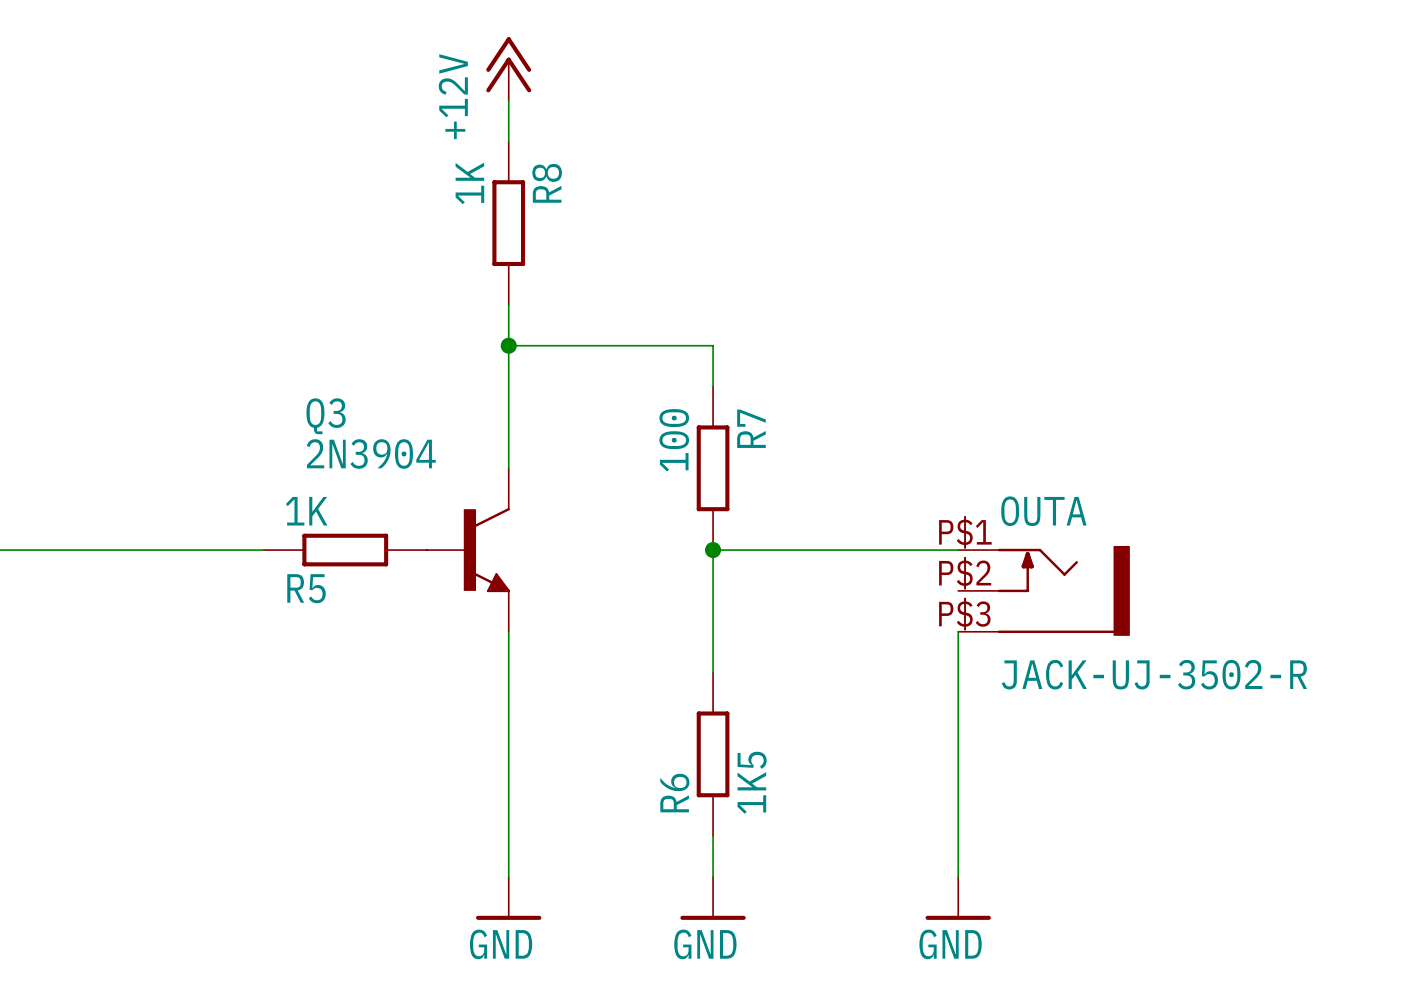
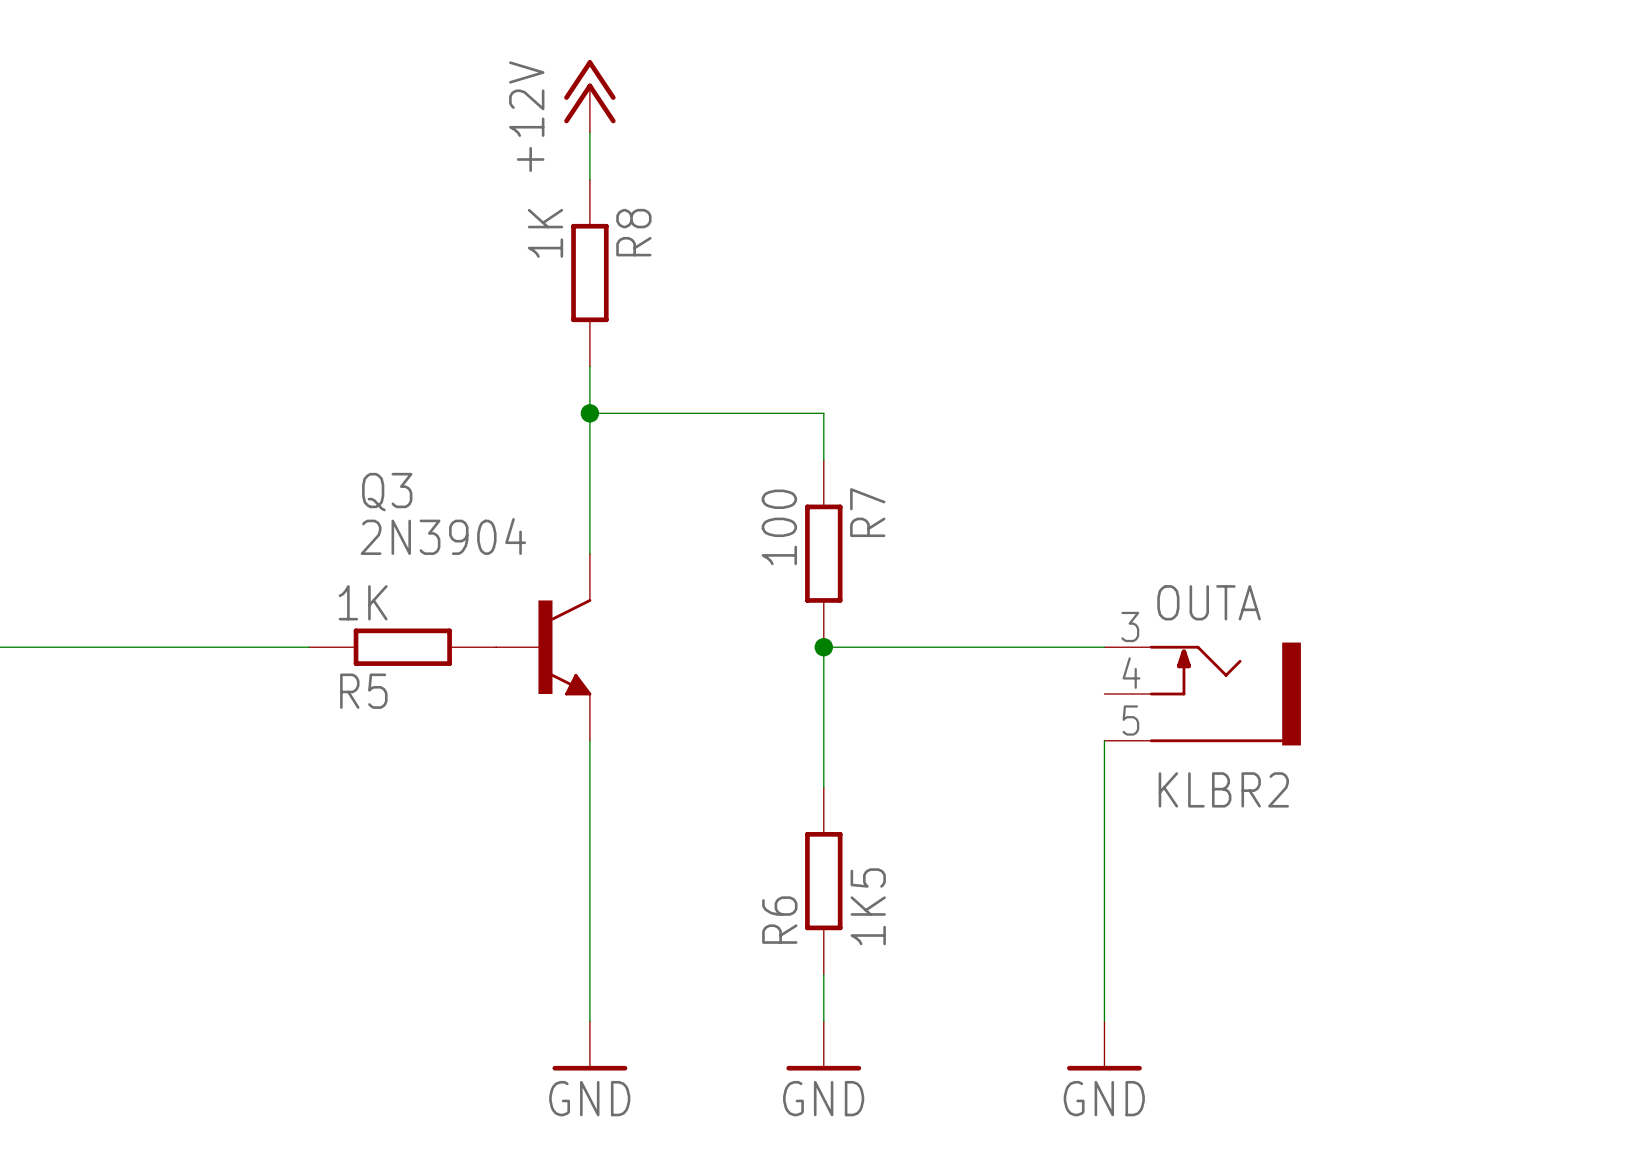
OUTA pin number: P$1 (965, 532) -> 3 (1130, 626)
OUTA pin number: P$2 (965, 573) -> 4 (1131, 673)
OUTA pin number: P$3 (964, 614) -> 5 (1130, 720)
OUTA value: JACK-UJ-3502-R (1154, 674) -> KLBR2 (1223, 789)

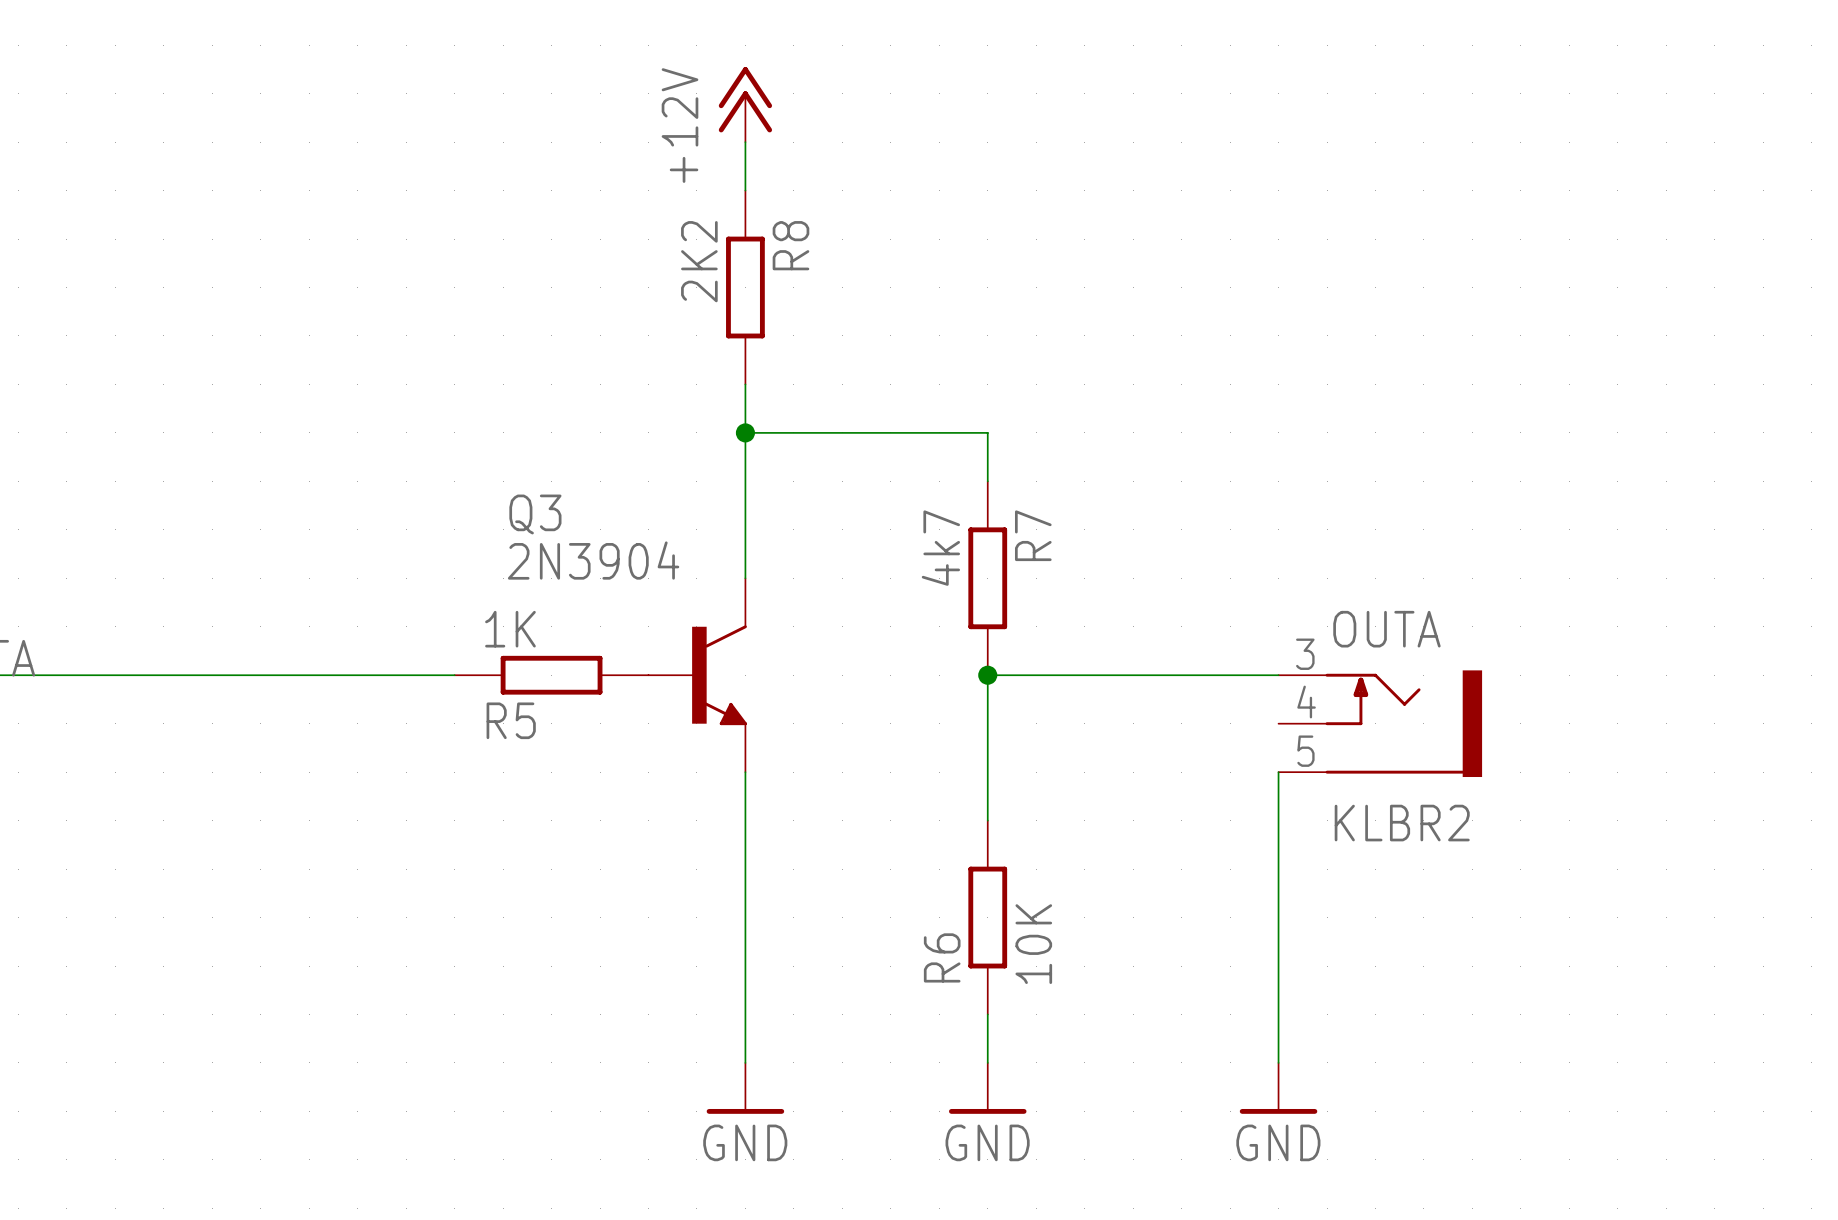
R8 value: 1K (545, 233) -> 2K2 (699, 261)
R7 value: 100 (779, 527) -> 4k7 (940, 548)
R6 value: 1K5 (868, 906) -> 10K (1033, 944)

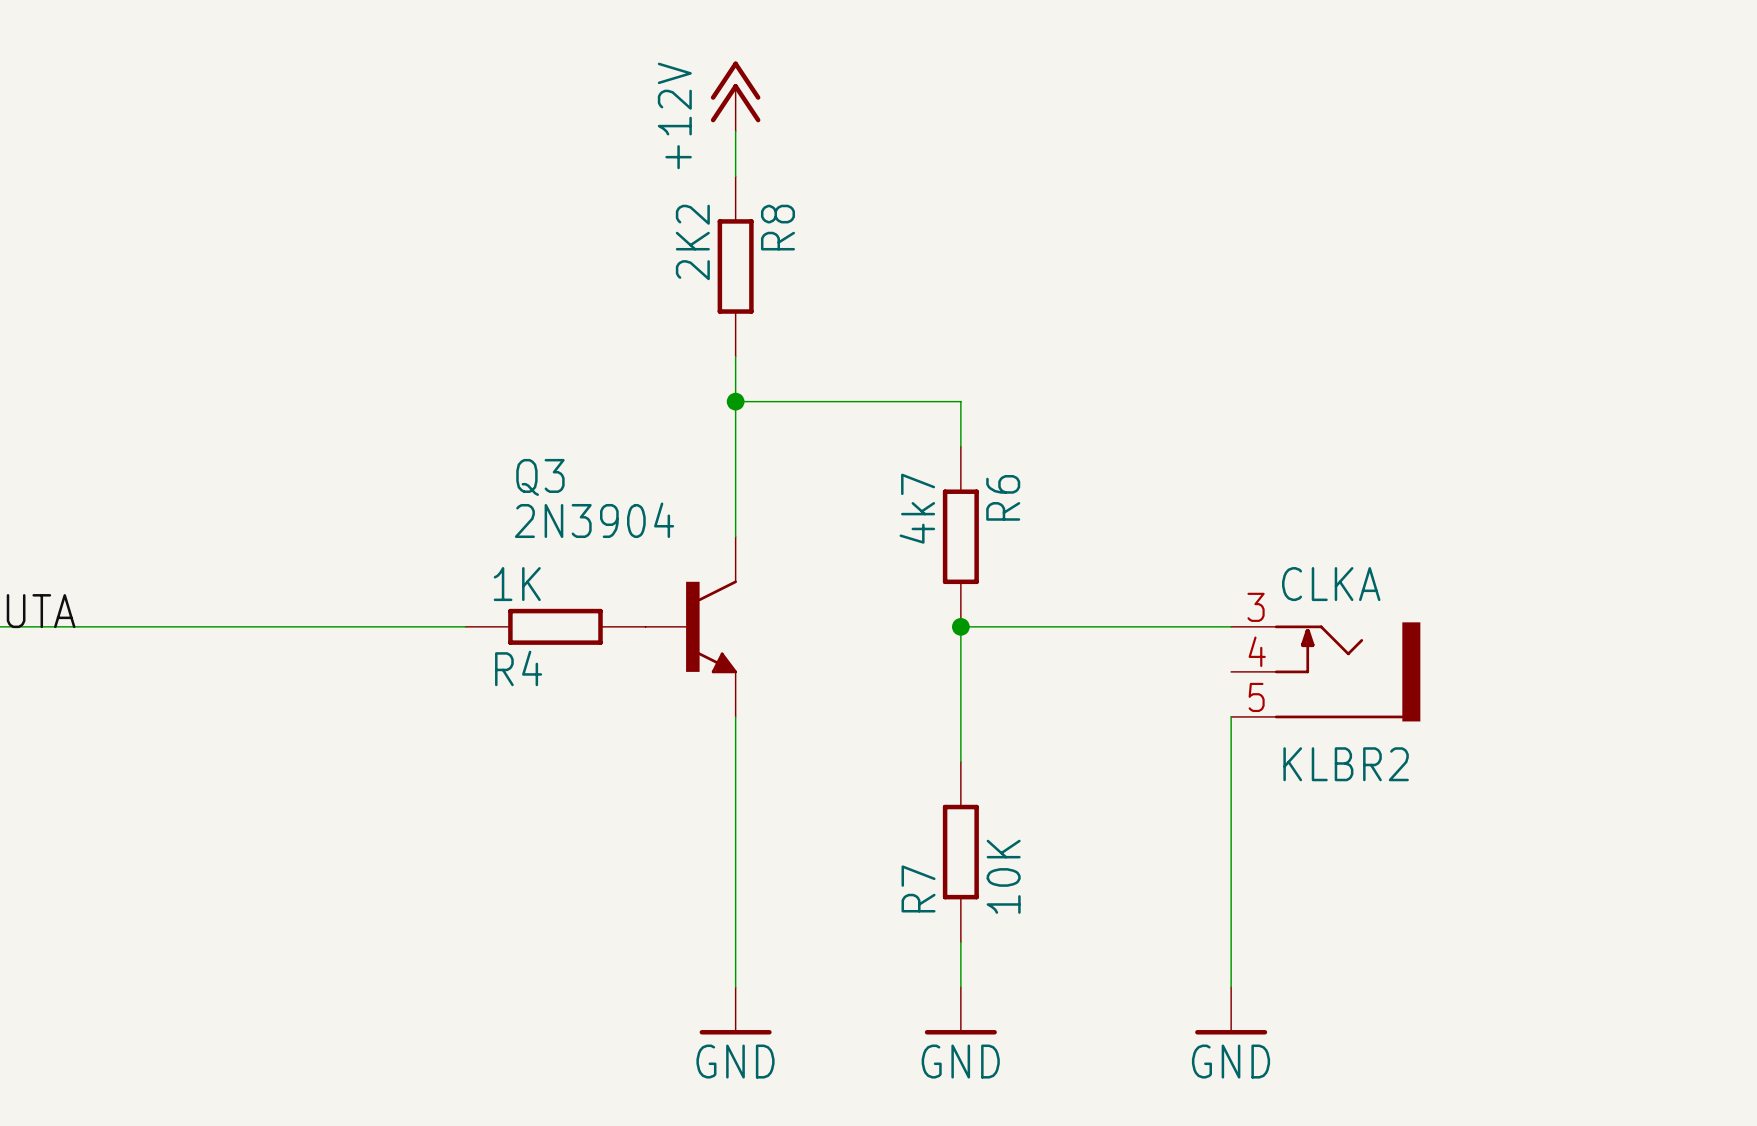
R7 name: R7 (1033, 535) -> R6 (1003, 497)
OUTA name: OUTA (1386, 629) -> CLKA (1331, 584)
R5 name: R5 (511, 720) -> R4 (518, 668)
R6 name: R6 (942, 957) -> R7 (918, 888)

